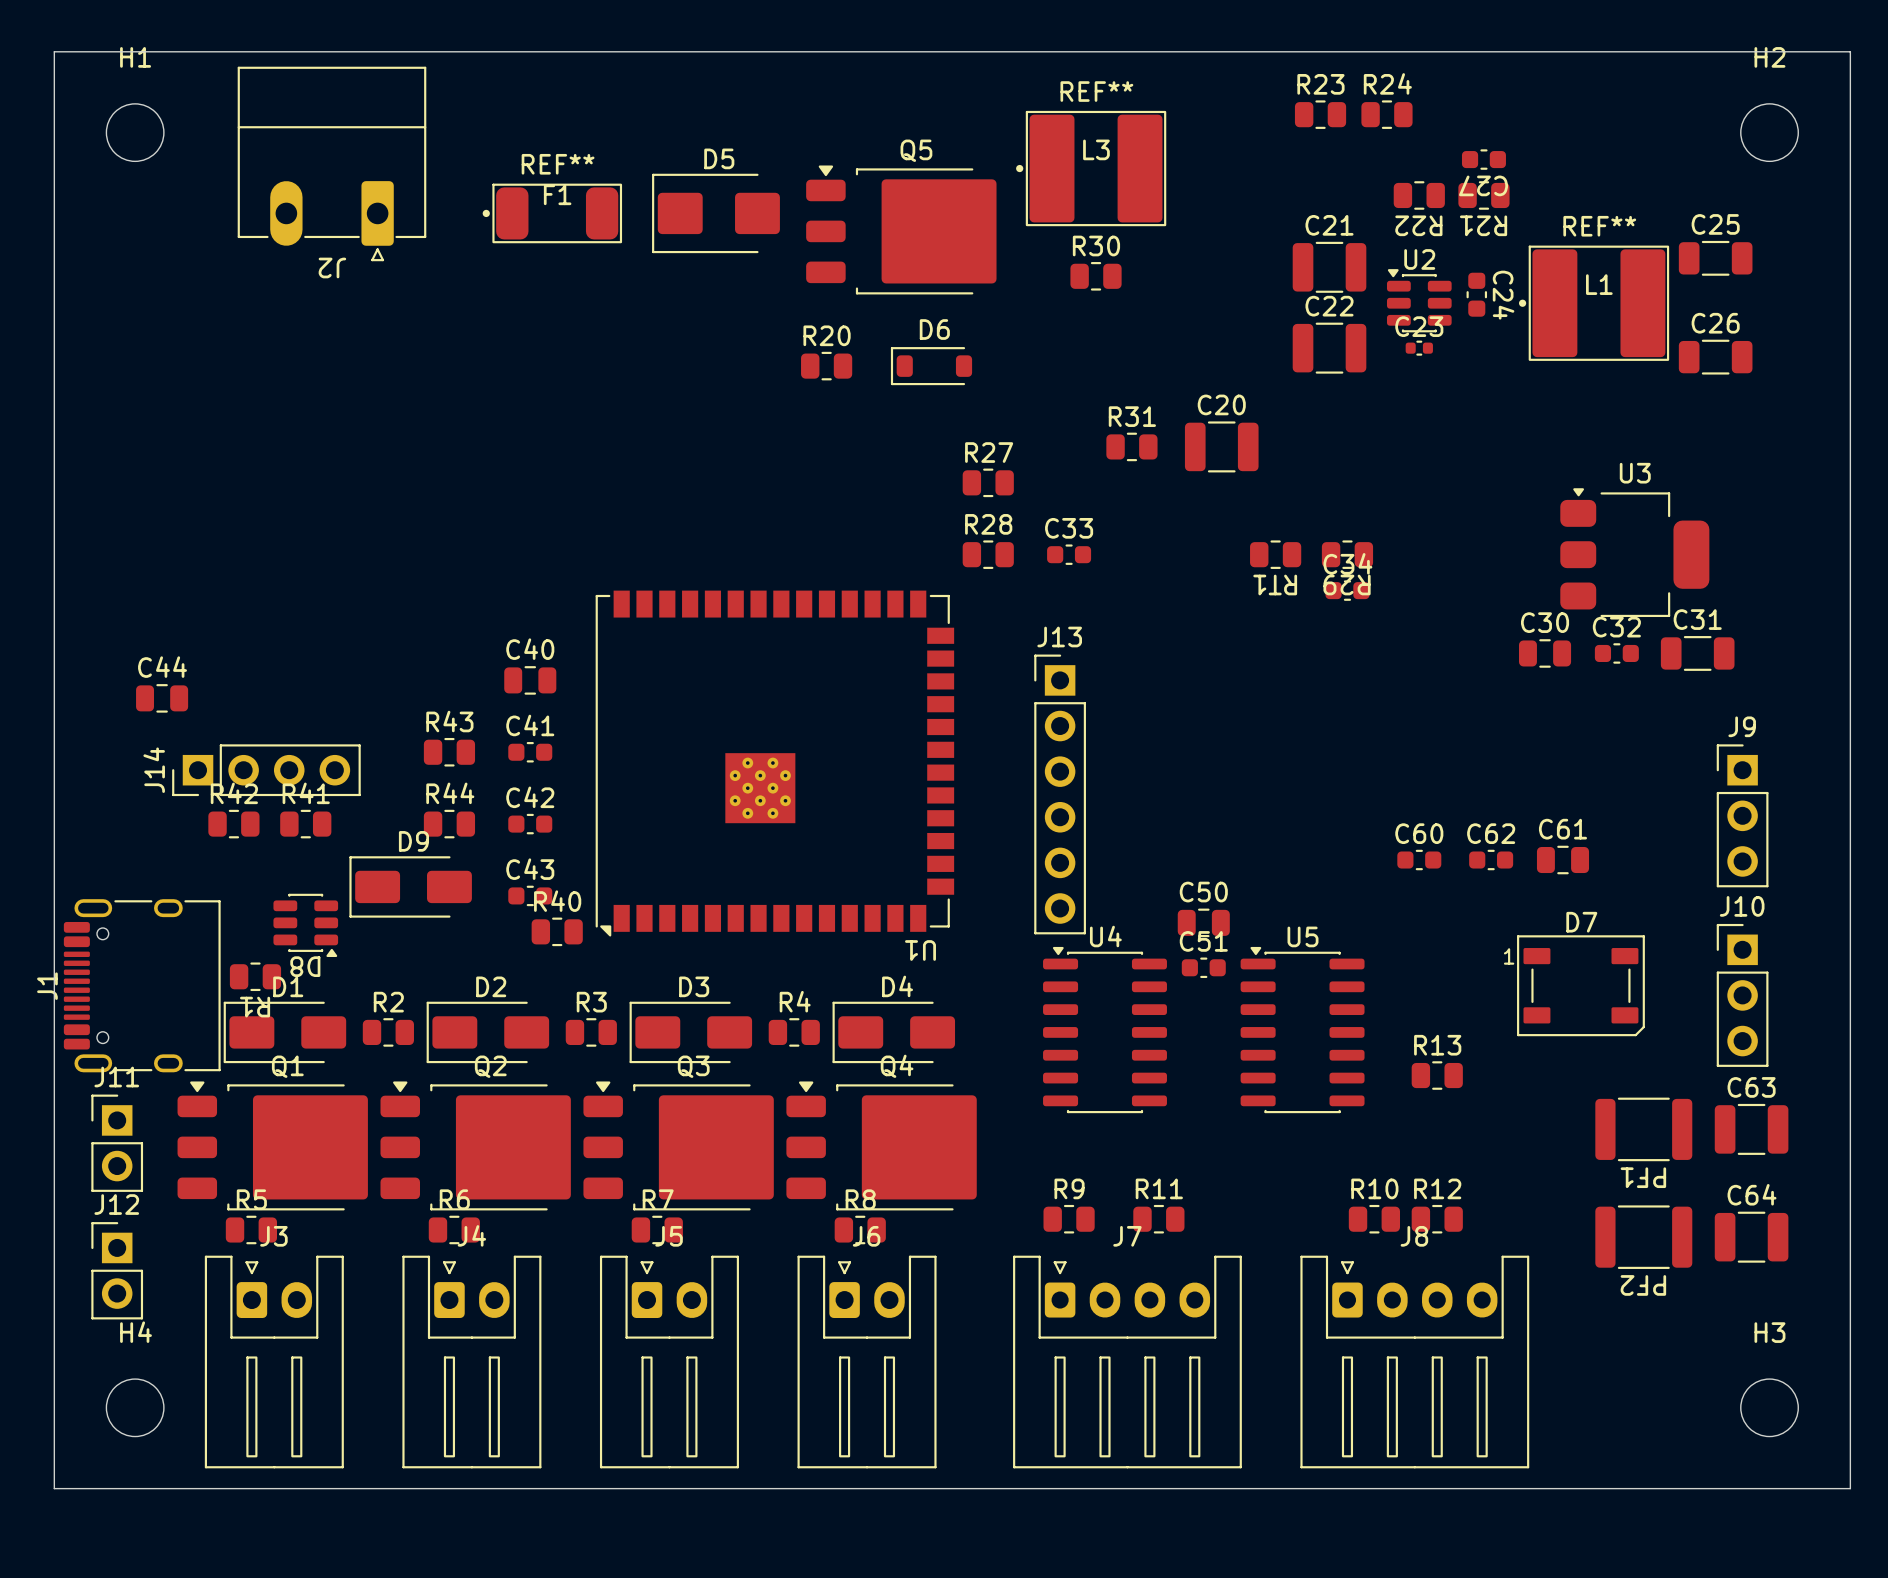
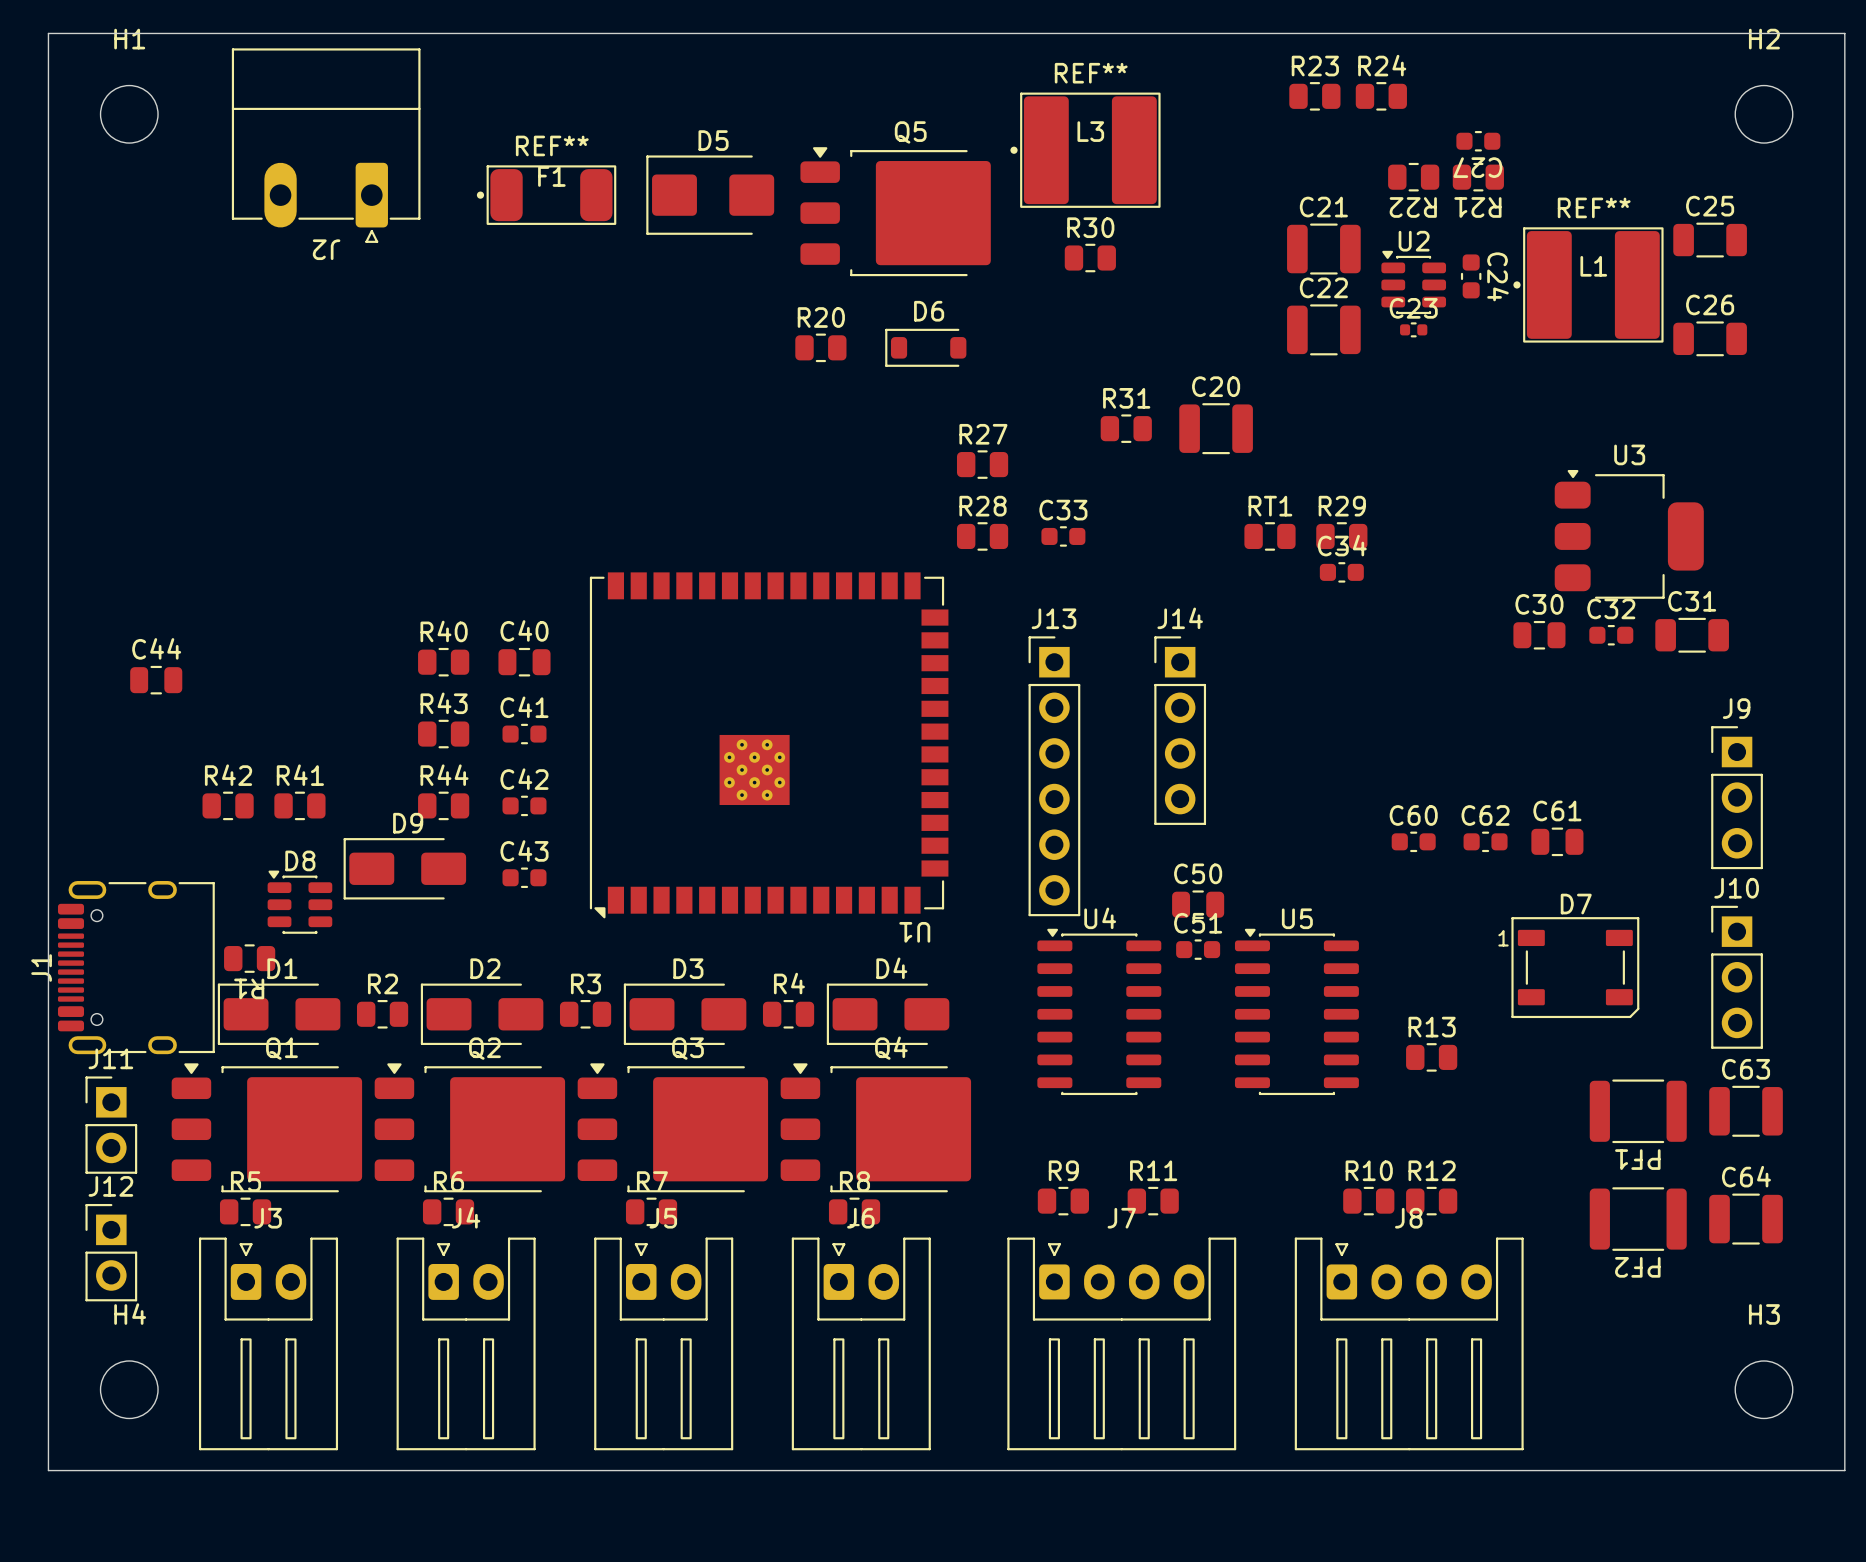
RT1 name rotation: 0° (1275, 584) -> 180° (1270, 506)
R29 name rotation: 0° (1347, 584) -> 180° (1342, 506)
J14 rotation: 0° (266, 770) -> 90° clockwise (1180, 730)
J14 position: (266, 770) -> (1180, 730)
D8 rotation: 0° (305, 925) -> 180° (299, 902)
R40 position: (557, 931) -> (443, 662)

